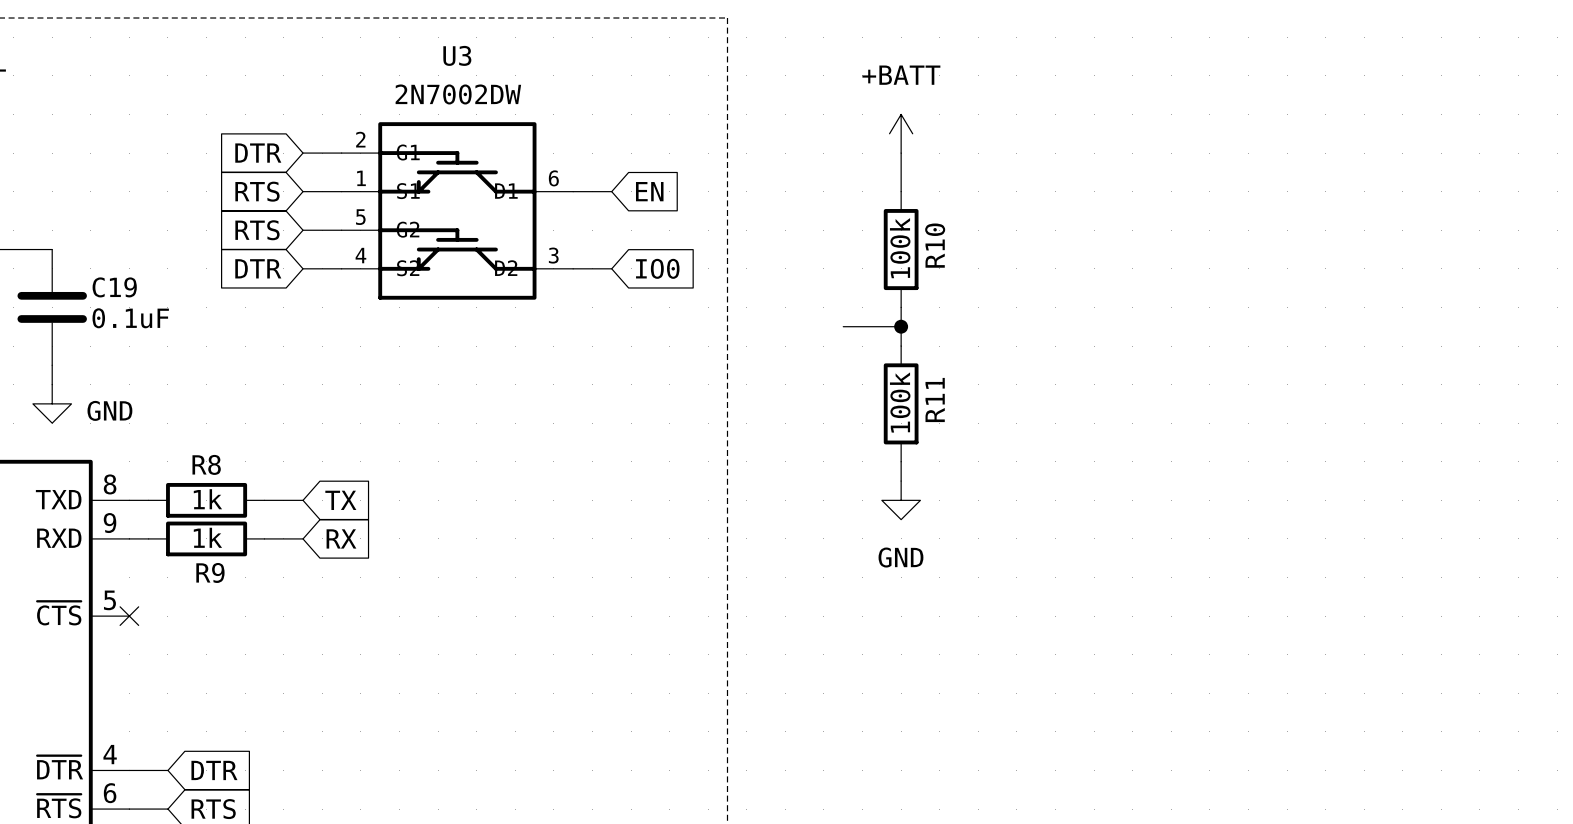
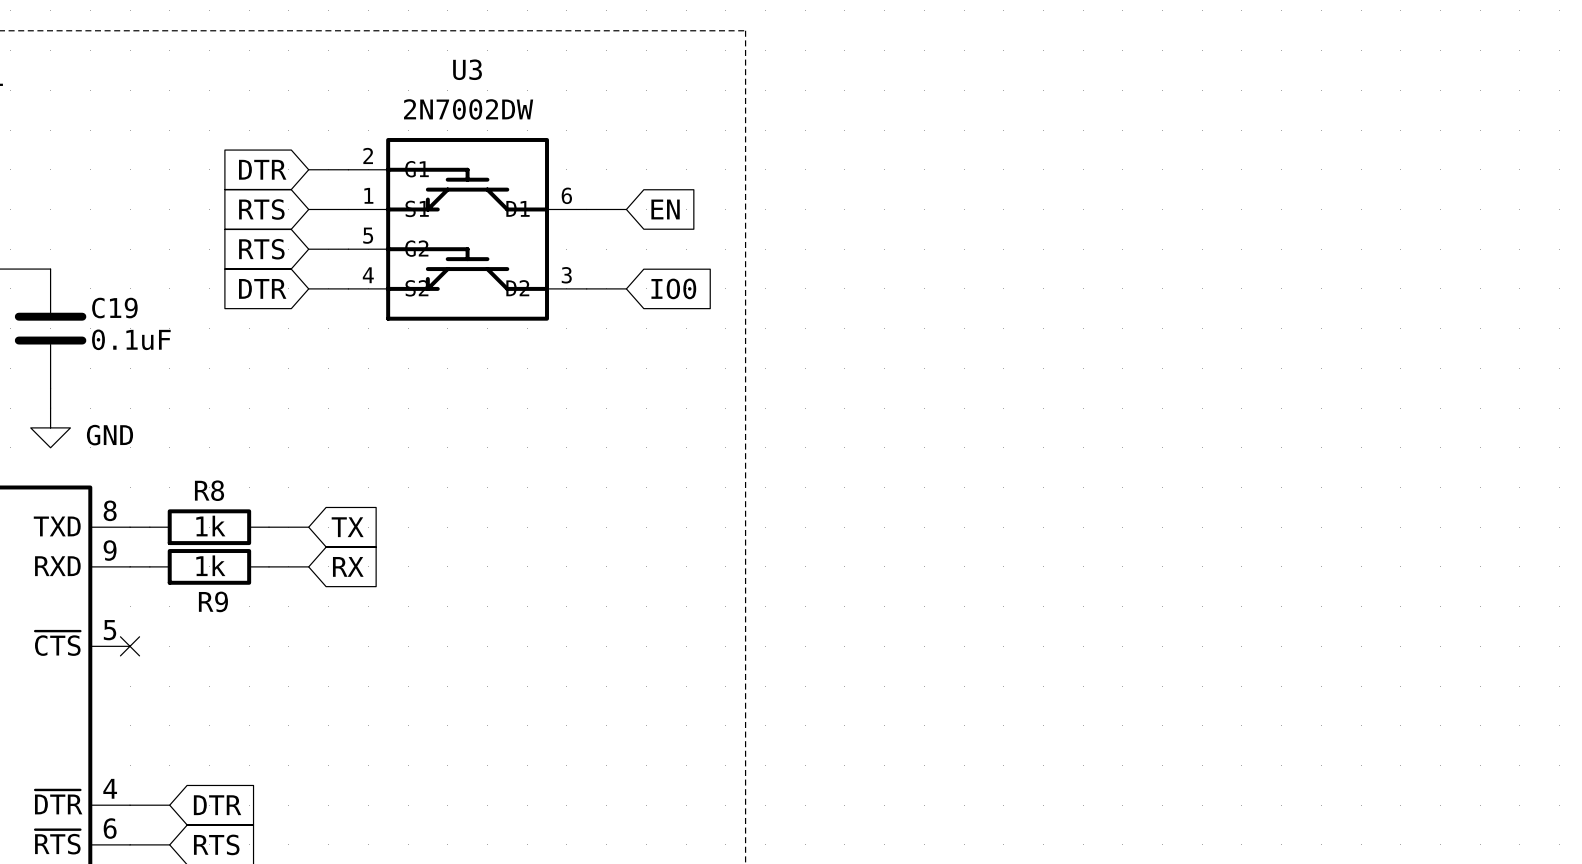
power symbol: +BATT (901, 133) -> none
wire: (901, 153) (901, 191) -> none
R10: 100k (901, 249) -> none
wire: (901, 307) (901, 346) -> none
wire: (843, 326) (901, 326) -> none
junction: (901, 326) -> none
R11: 100k (901, 403) -> none
wire: (901, 461) (901, 481) -> none
power symbol: GND (901, 500) -> none

